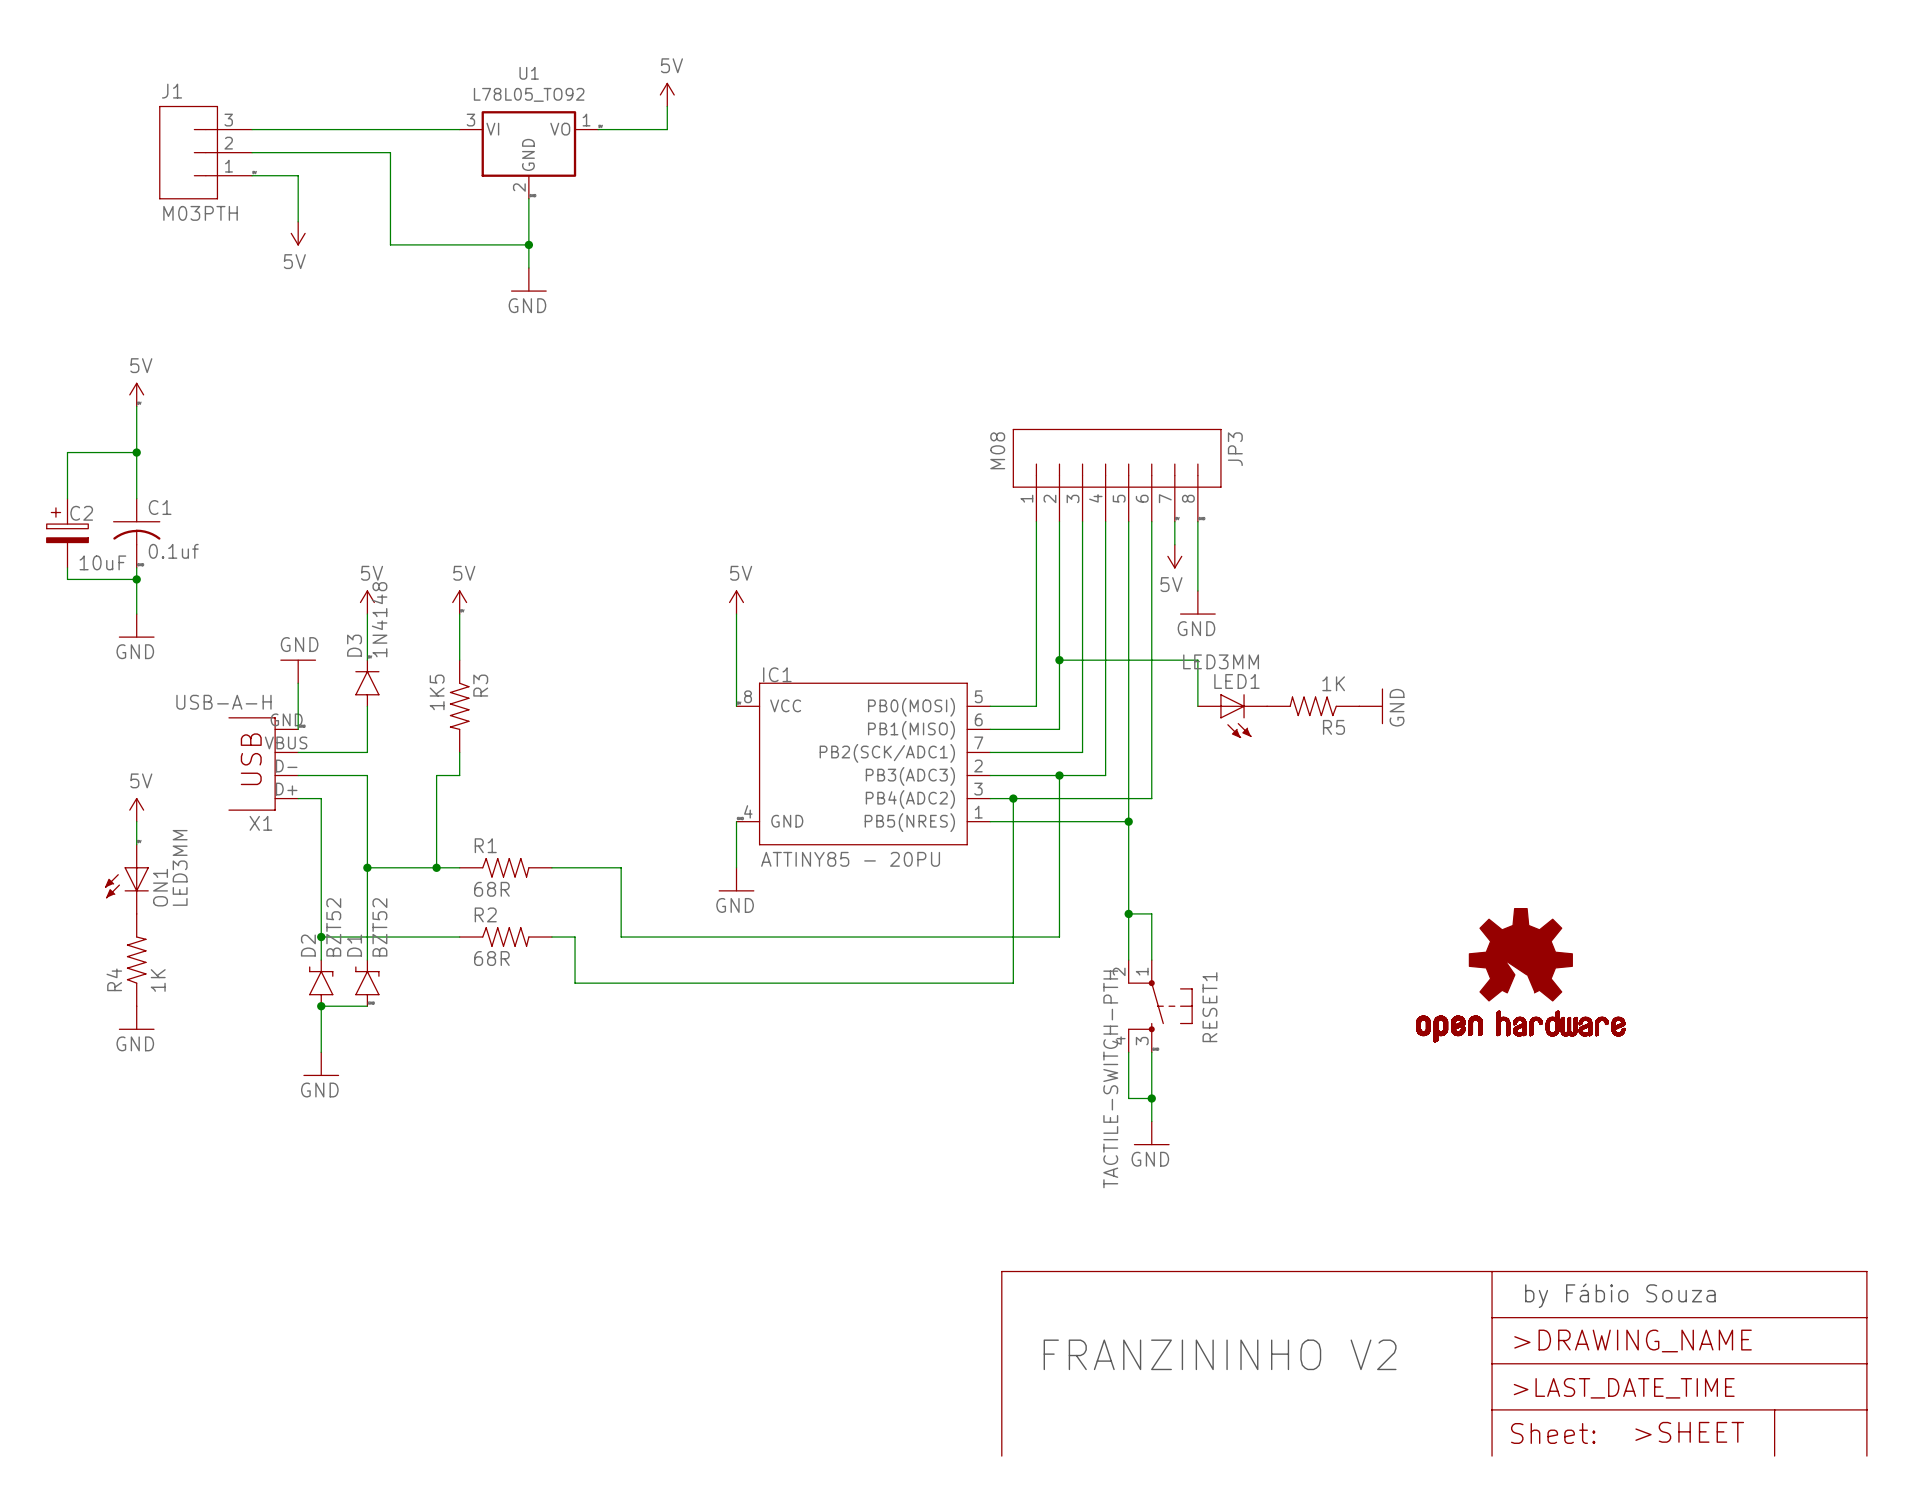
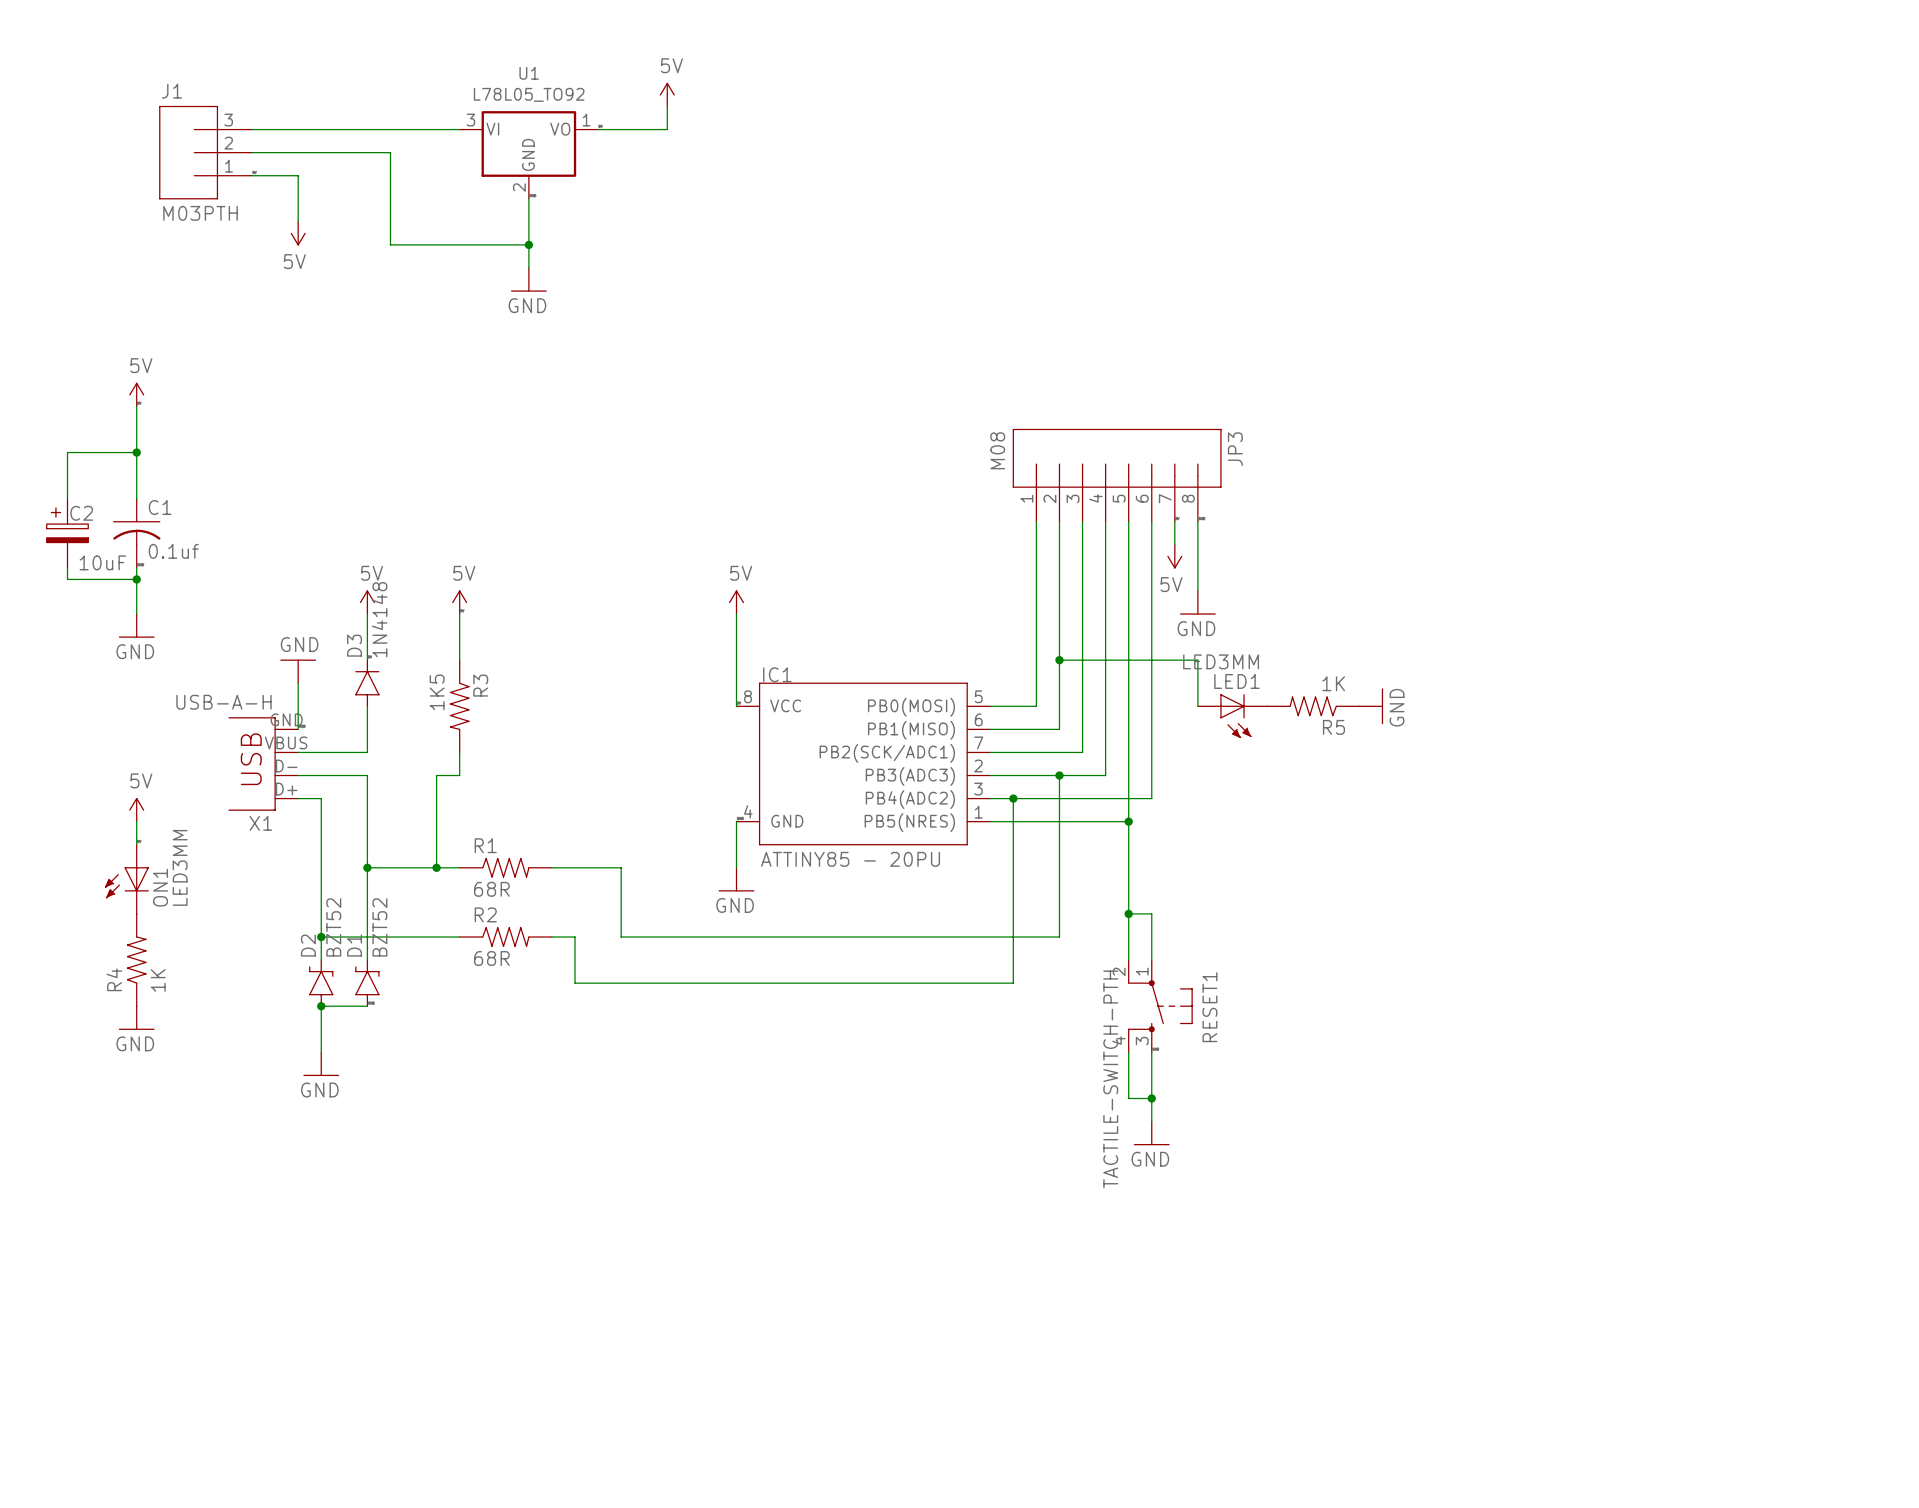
part: (1520, 975) -> none
text: by Fábio Souza (1620, 1295) -> none
text: FRANZININHO V2 (1220, 1354) -> none
power symbol: (1434, 1363) -> none

